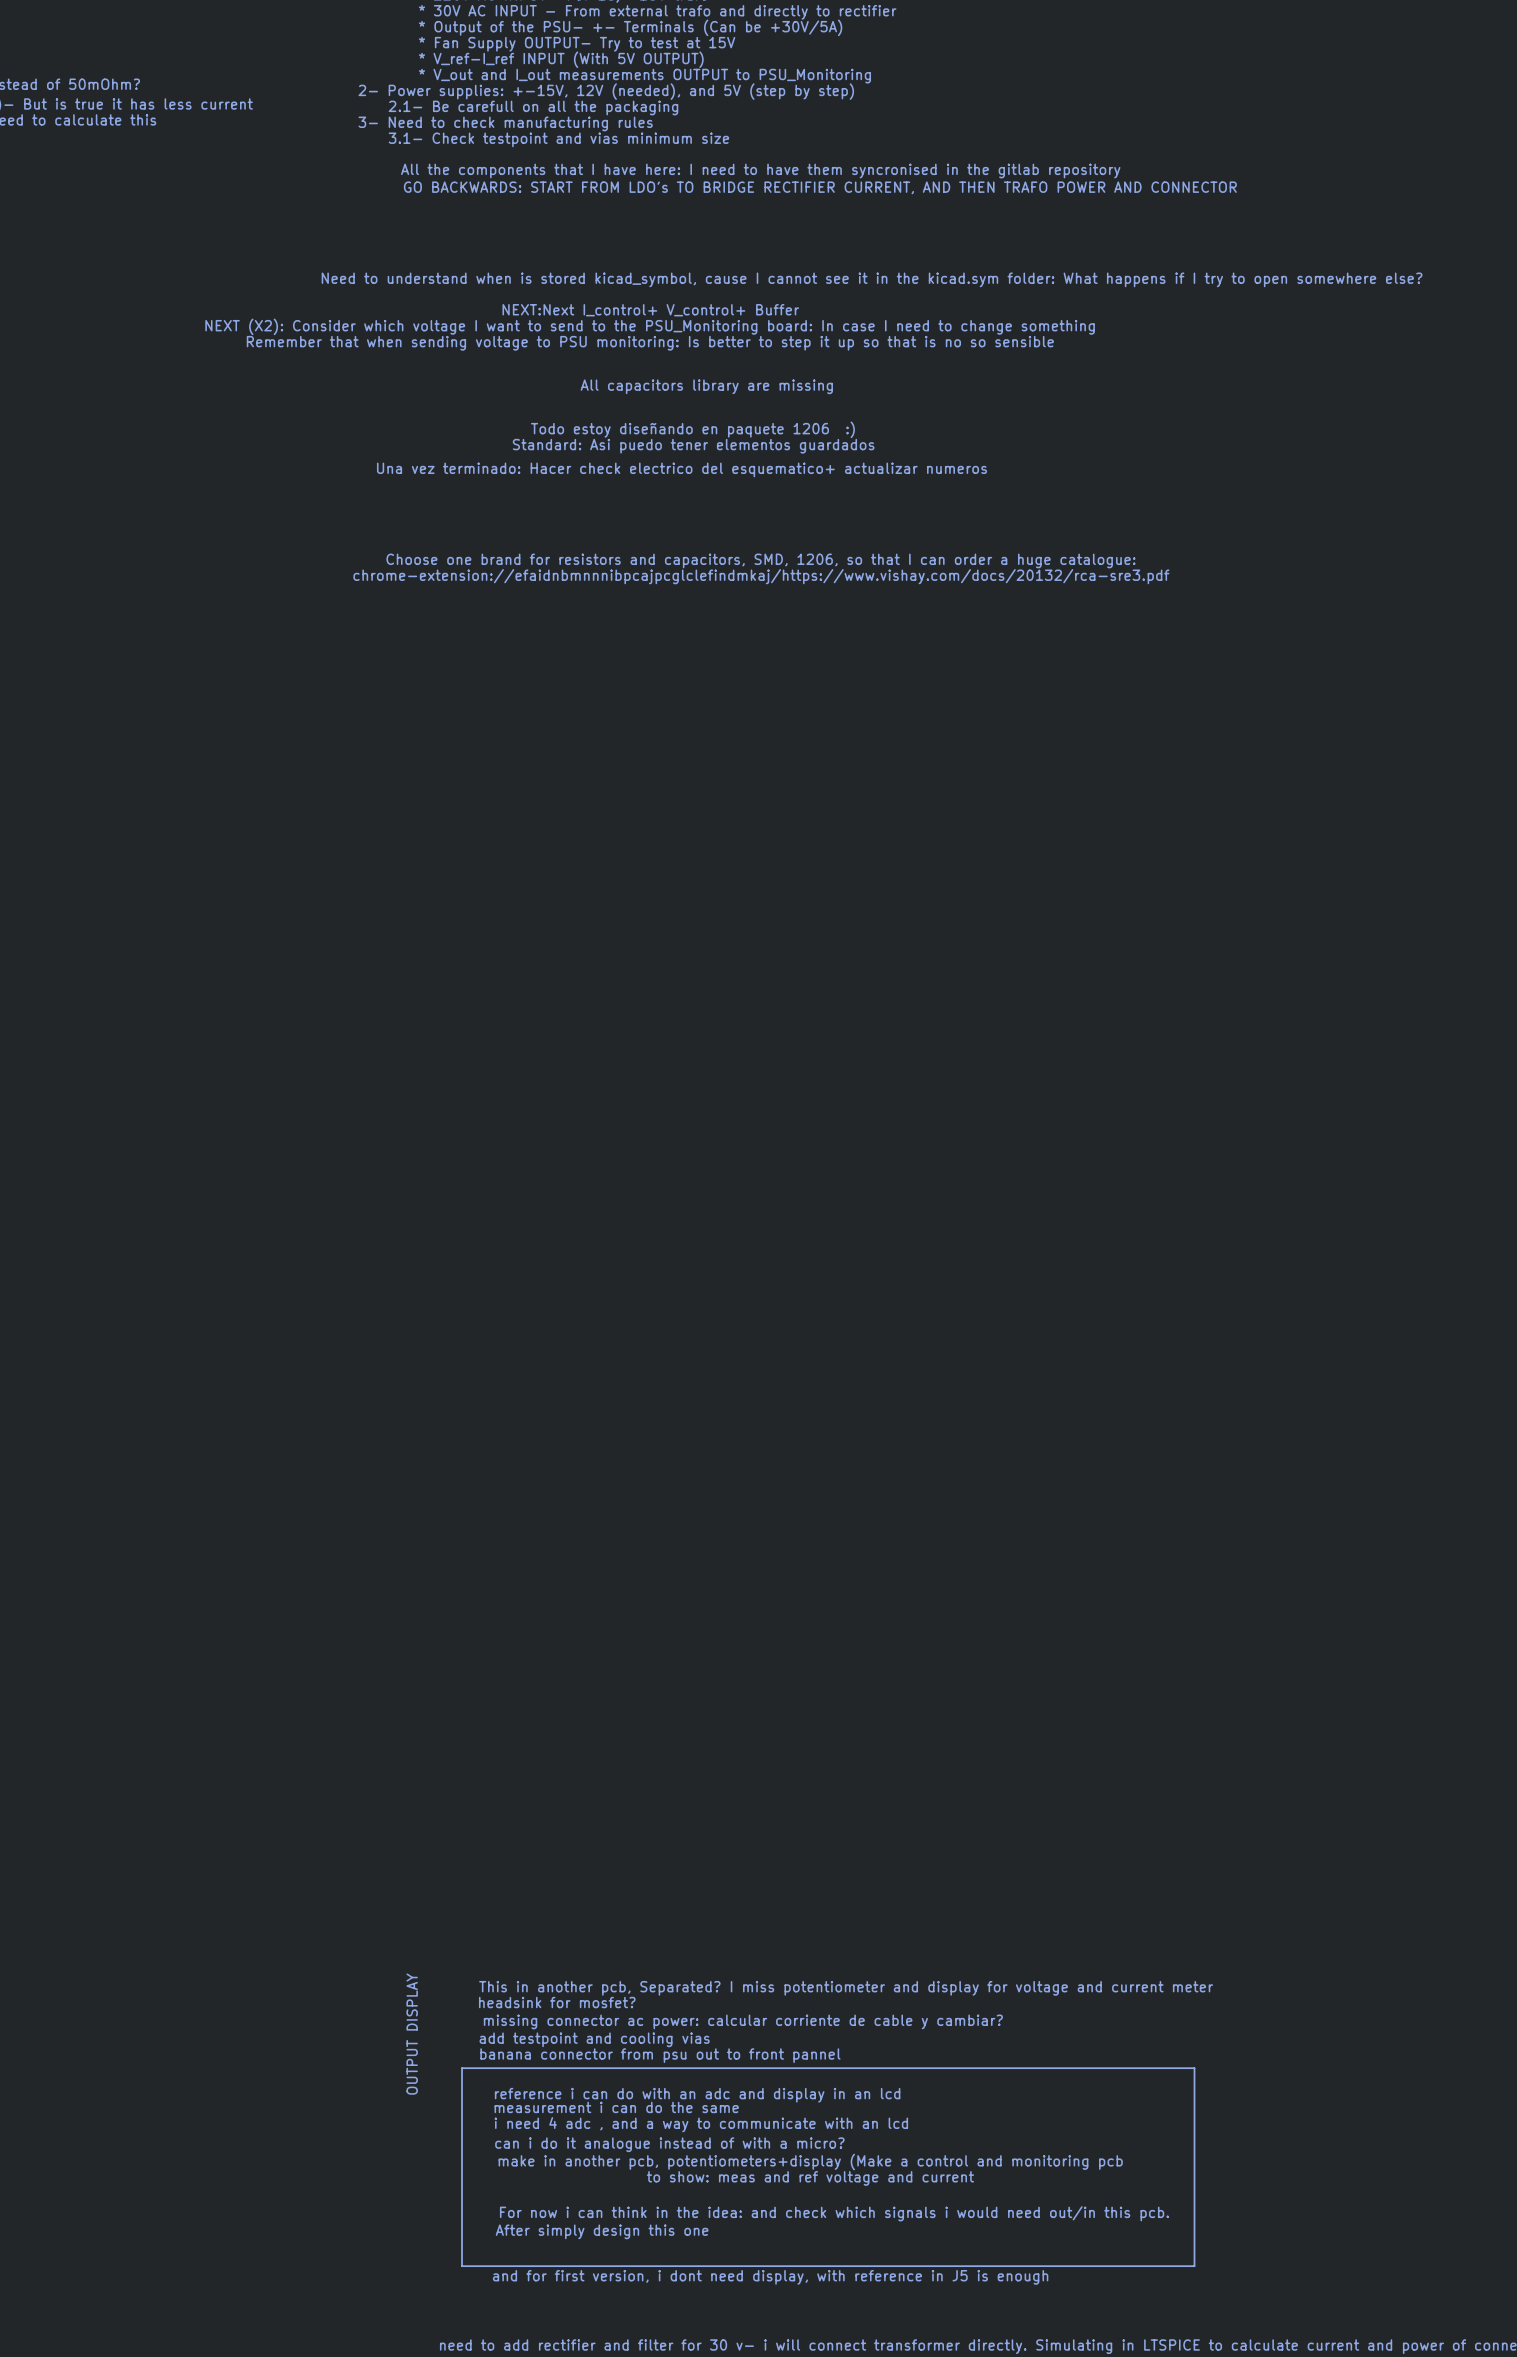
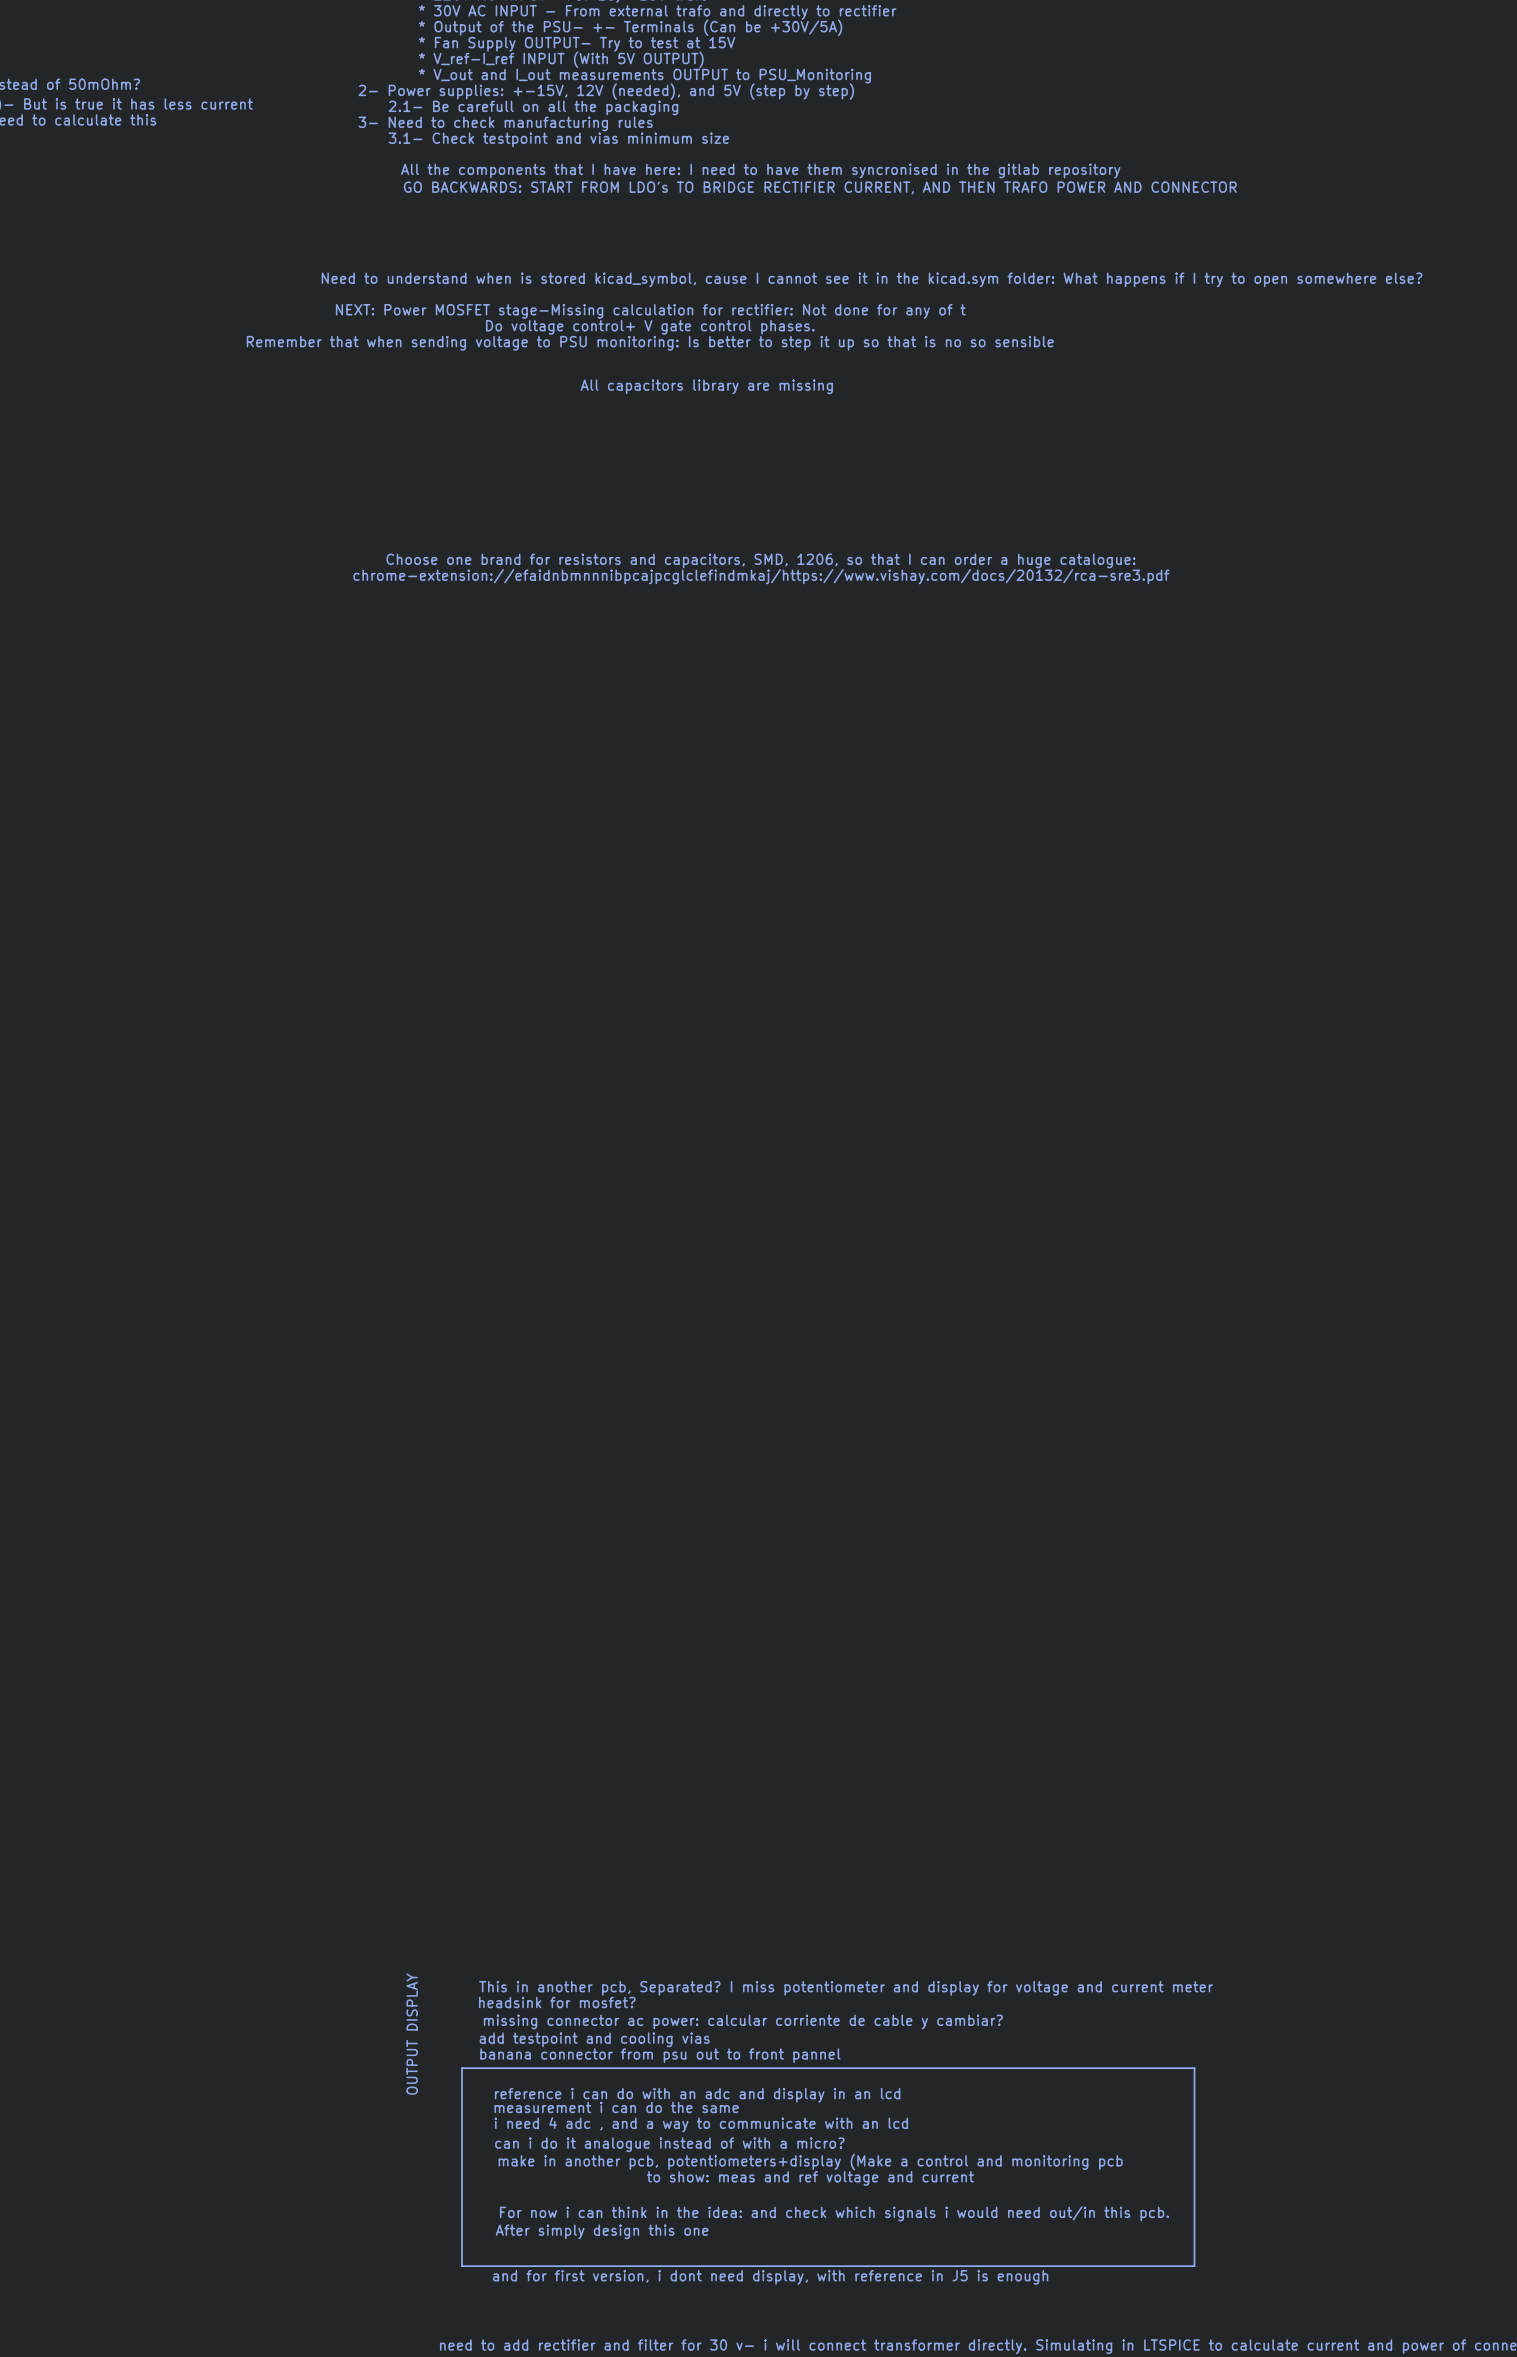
text: NEXT:Next I_control+ V_control+ Buffer (650, 310) -> NEXT: Power MOSFET stage-Missing calculation for rectifier: Not done for any of t (650, 311)
text: NEXT (X2): Consider which voltage I want to send to the PSU_Monitoring board: In case I need to change something (650, 326) -> Do voltage control+ V gate control phases. (650, 327)
text: Todo estoy diseñando en paquete 1206 :) (692, 429) -> none
text: Standard: Asi puedo tener elementos guardados (693, 446) -> none
text: Una vez terminado: Hacer check electrico del esquematico+ actualizar numeros (682, 469) -> none

